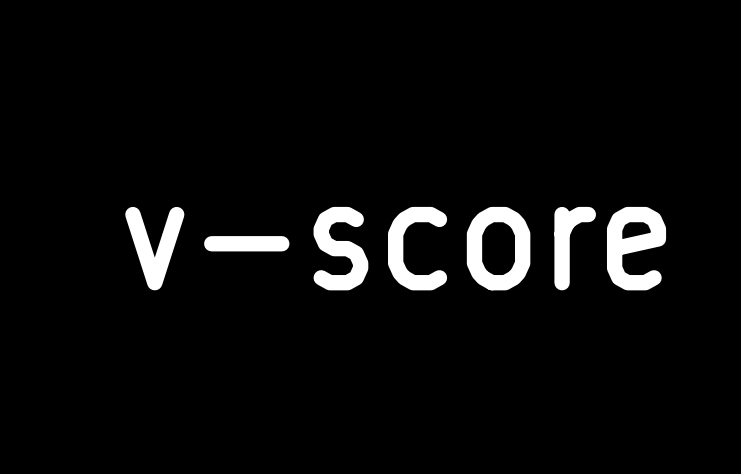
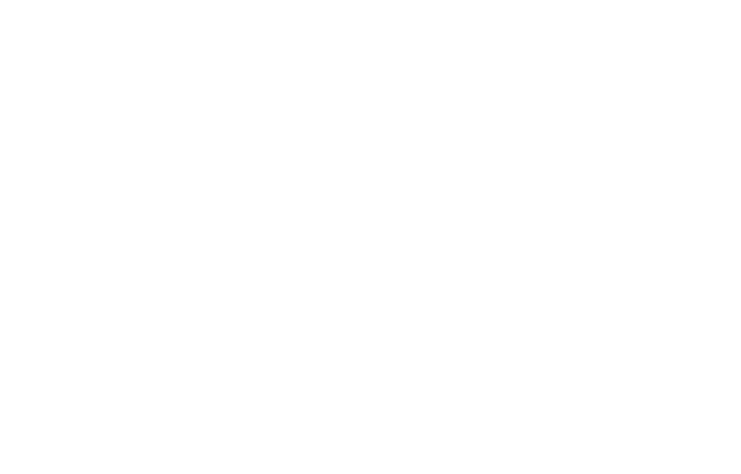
text: v-score (395, 248) -> none

